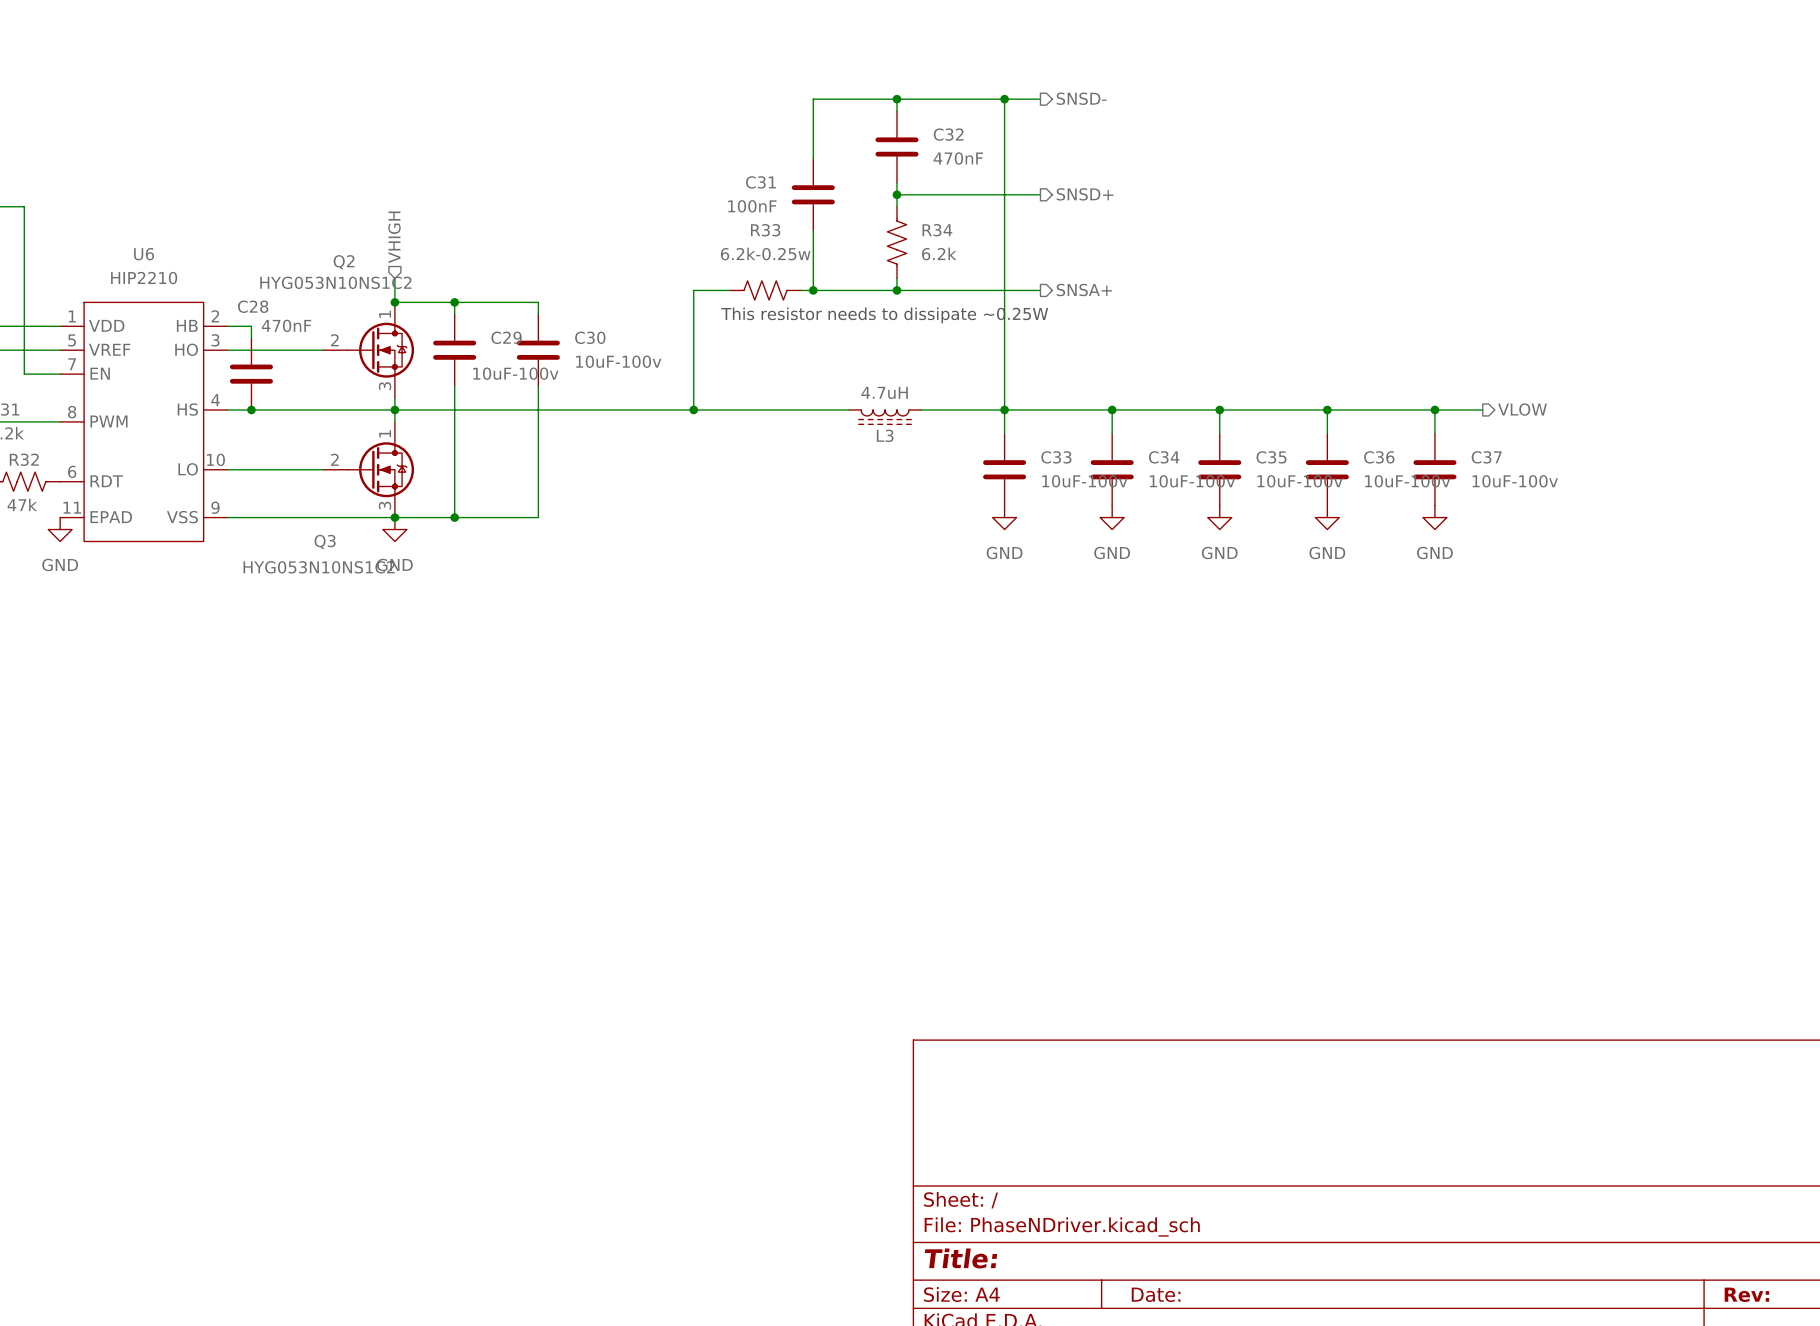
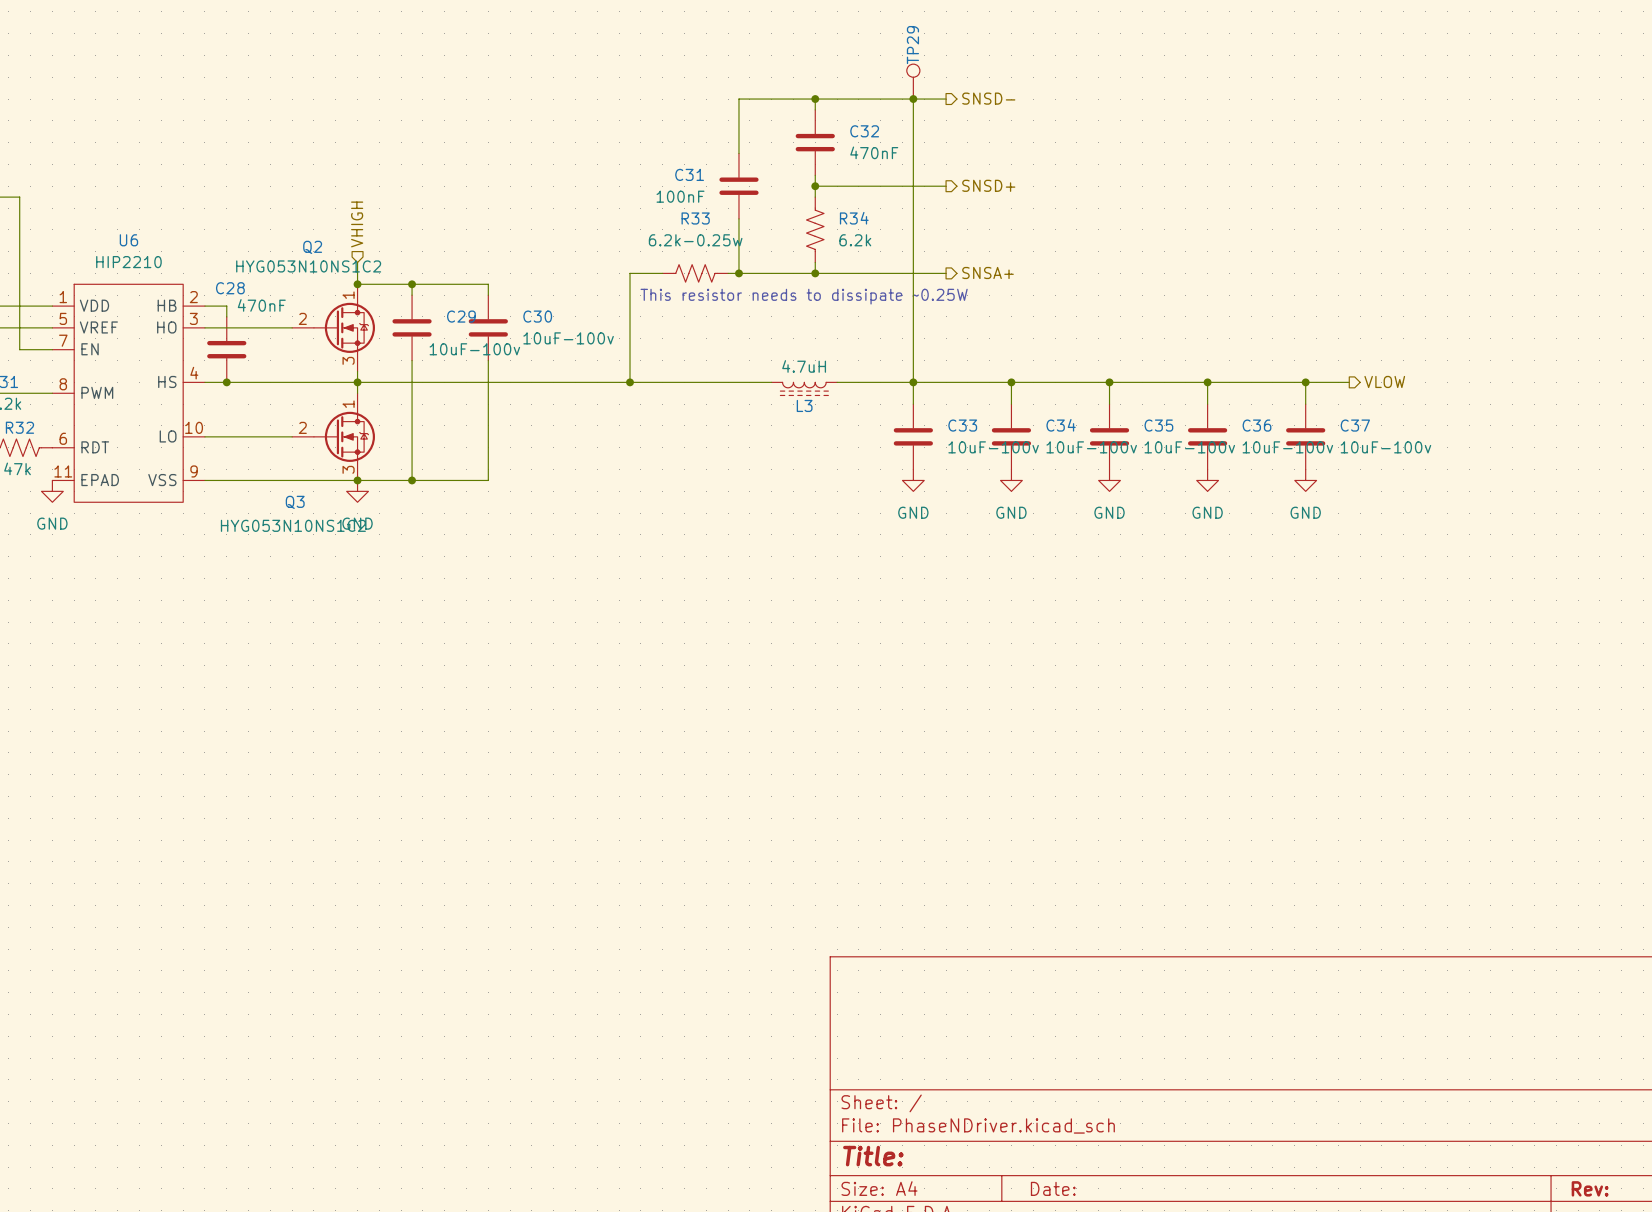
TP29: none -> (913, 81)

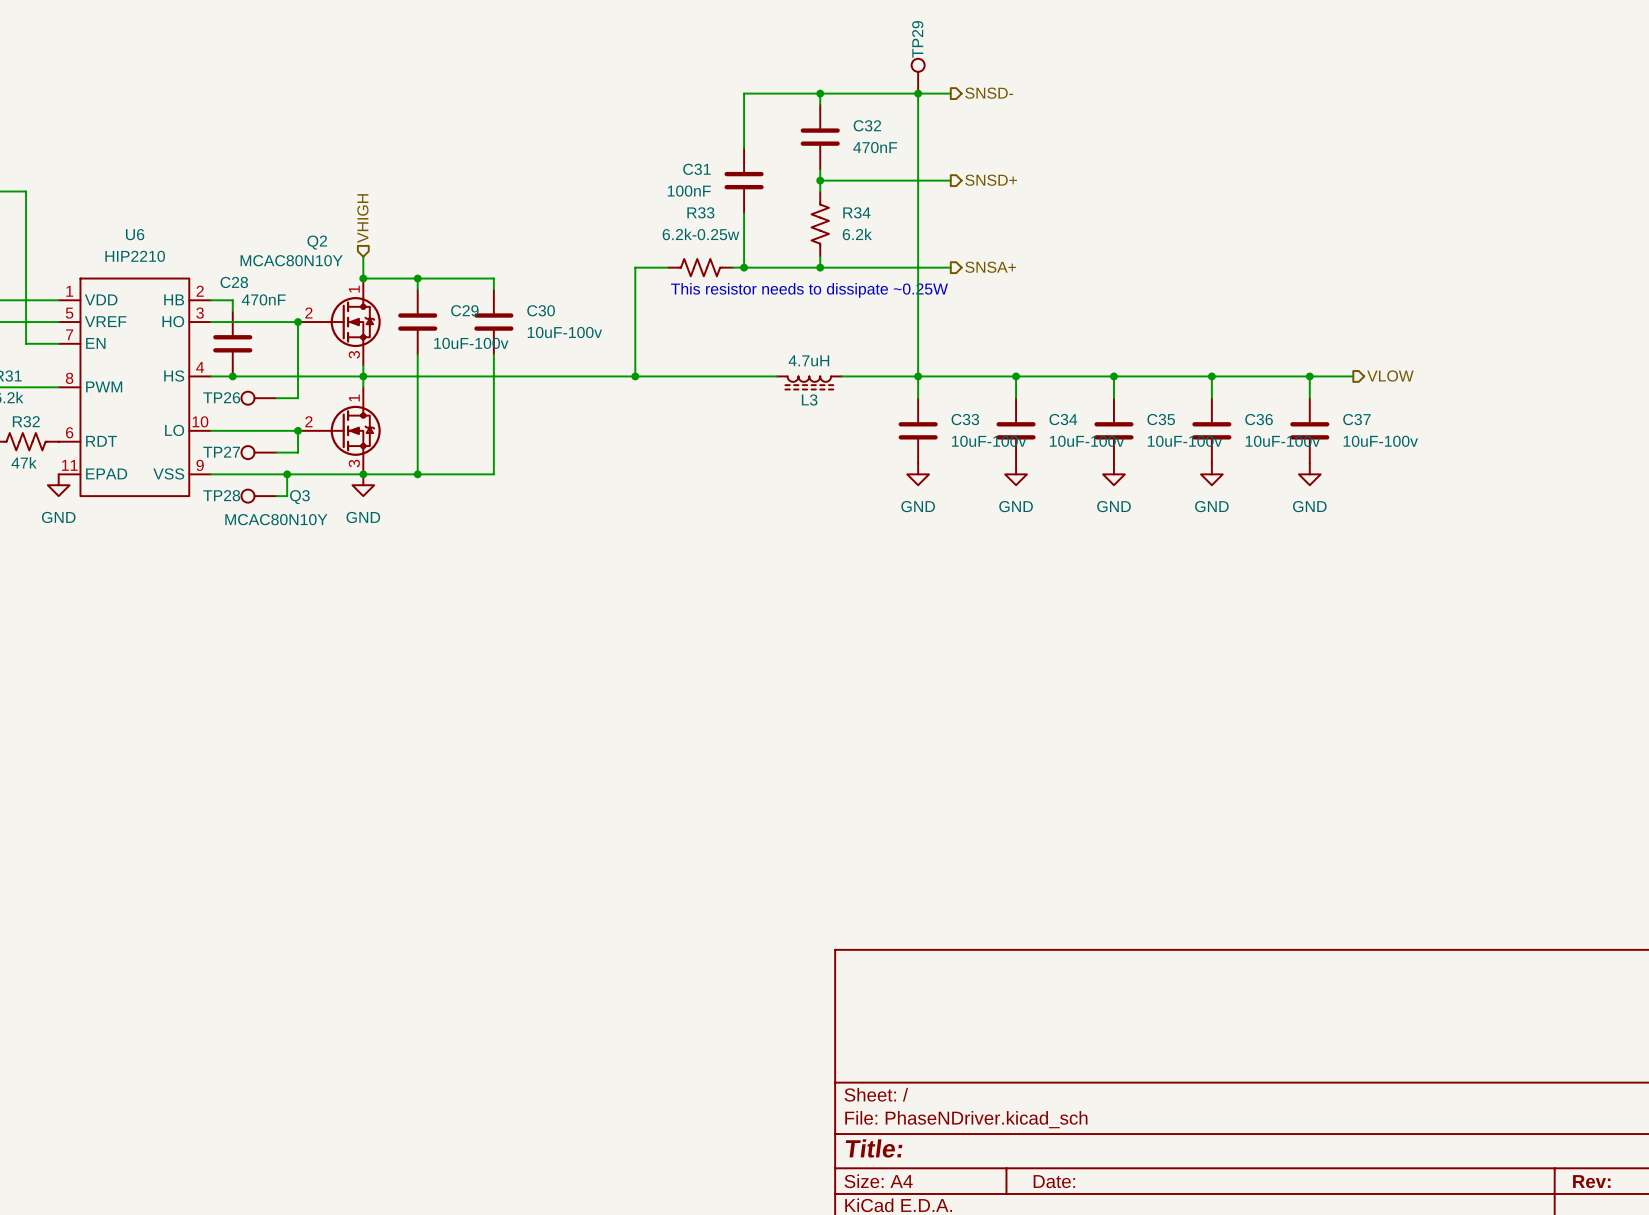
Q2 value: HYG053N10NS1C2 (308, 266) -> MCAC80N10Y (291, 260)
wire: none -> (298, 322) (298, 398) (276, 398)
junction: none -> (298, 322)
TP26: none -> (258, 398)
wire: none -> (298, 430) (298, 452) (276, 452)
junction: none -> (298, 430)
TP27: none -> (258, 452)
wire: none -> (287, 474) (287, 496) (276, 496)
junction: none -> (287, 474)
TP28: none -> (258, 496)
Q3 value: HYG053N10NS1C2 (293, 525) -> MCAC80N10Y (276, 519)

